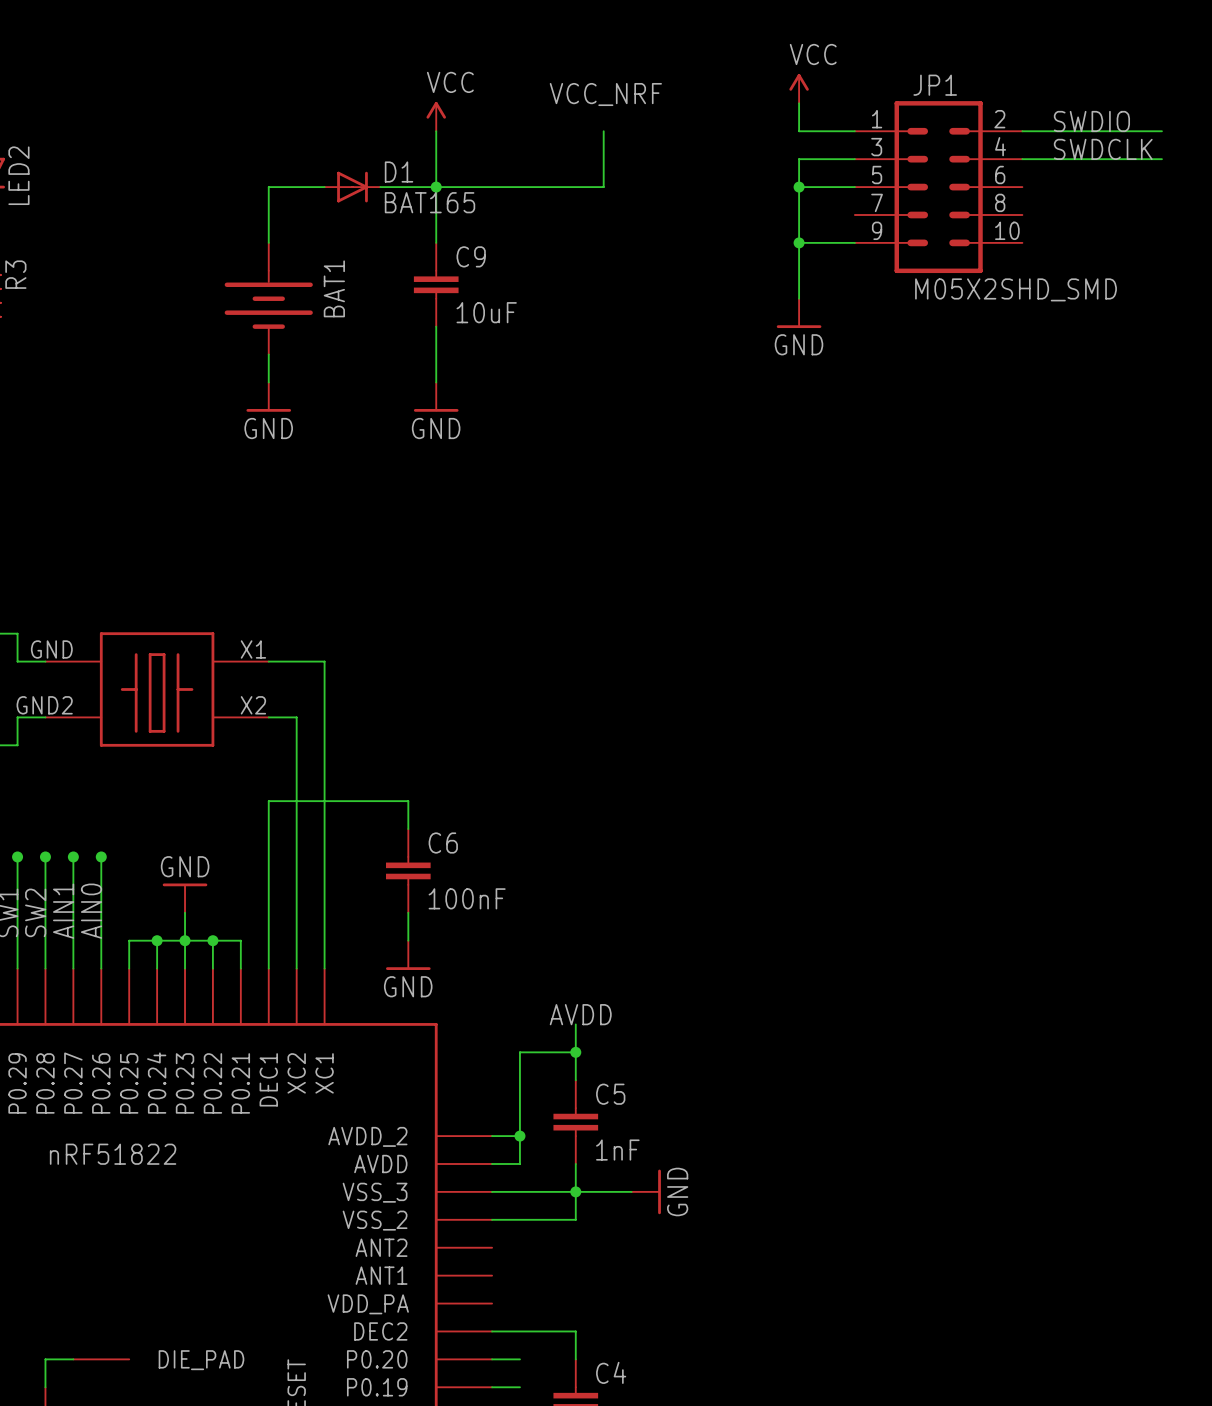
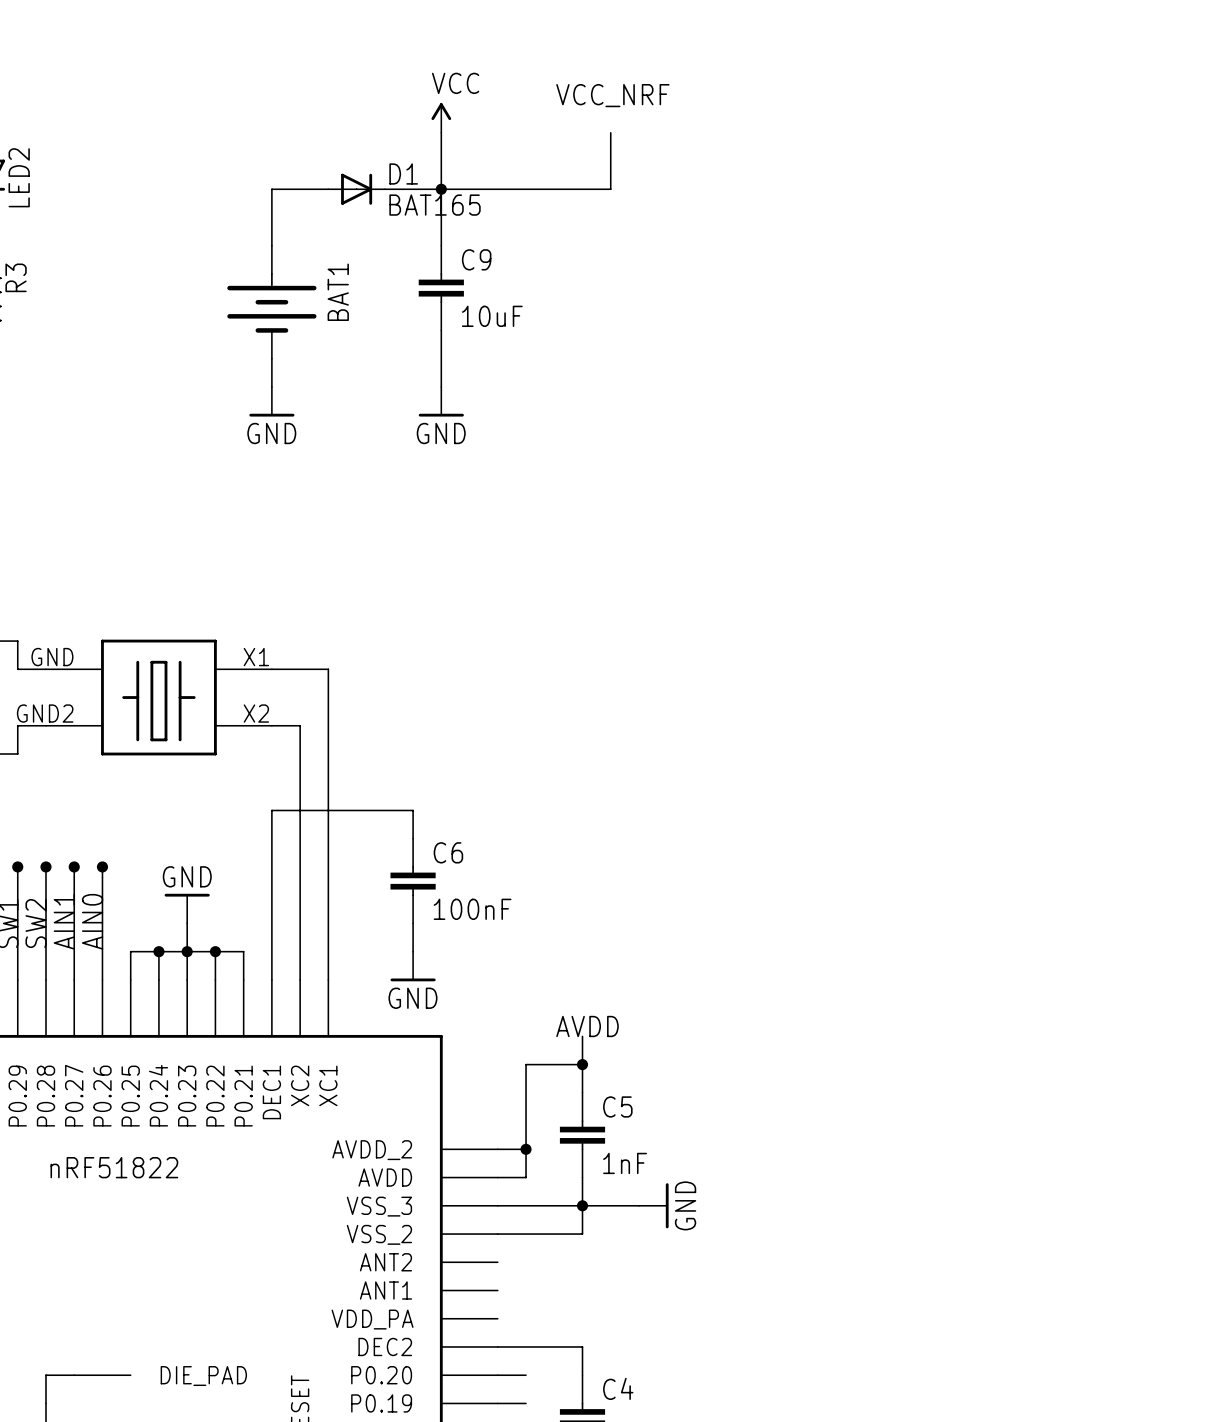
power symbol: VCC (799, 88) -> none
wire: (799, 103) (799, 131) (854, 131) -> none
label: SWDIO (1091, 121) -> none
wire: (1022, 131) (1161, 131) -> none
label: SWDCLK (1103, 149) -> none
wire: (854, 159) (799, 159) (799, 298) -> none
wire: (1022, 159) (1161, 159) -> none
wire: (799, 187) (854, 187) -> none
junction: (799, 187) -> none
JP1: M05X2SHD_SMD (938, 187) -> none
wire: (799, 242) (854, 242) -> none
junction: (799, 242) -> none
power symbol: GND (799, 313) -> none

